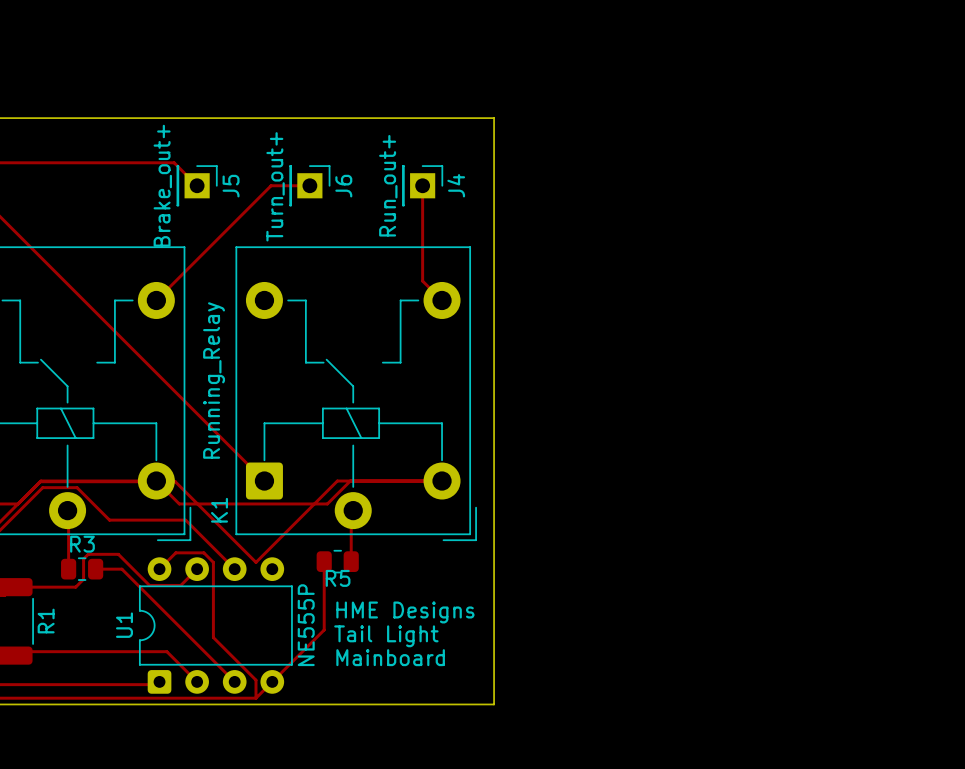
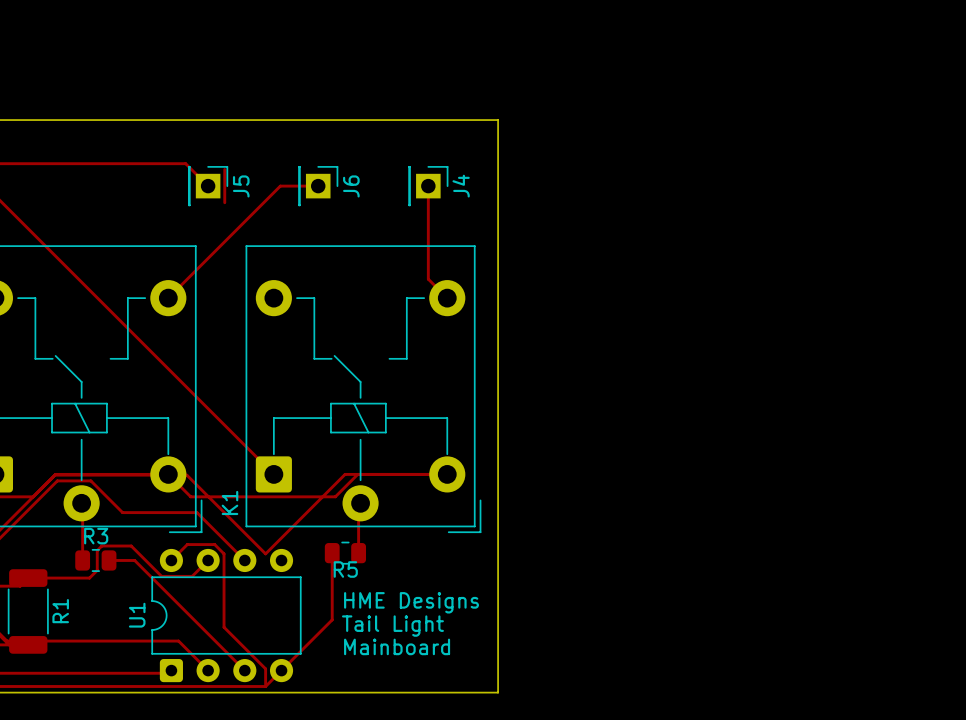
track: none -> (224, 169) (224, 202)
J5 value: Brake_out+ (162, 185) -> none
J4 value: Run_out+ (388, 185) -> none
J6 value: Turn_out+ (275, 186) -> none
K1 value: Running_Relay (214, 380) -> none
U1 value: NE555P (306, 625) -> none

